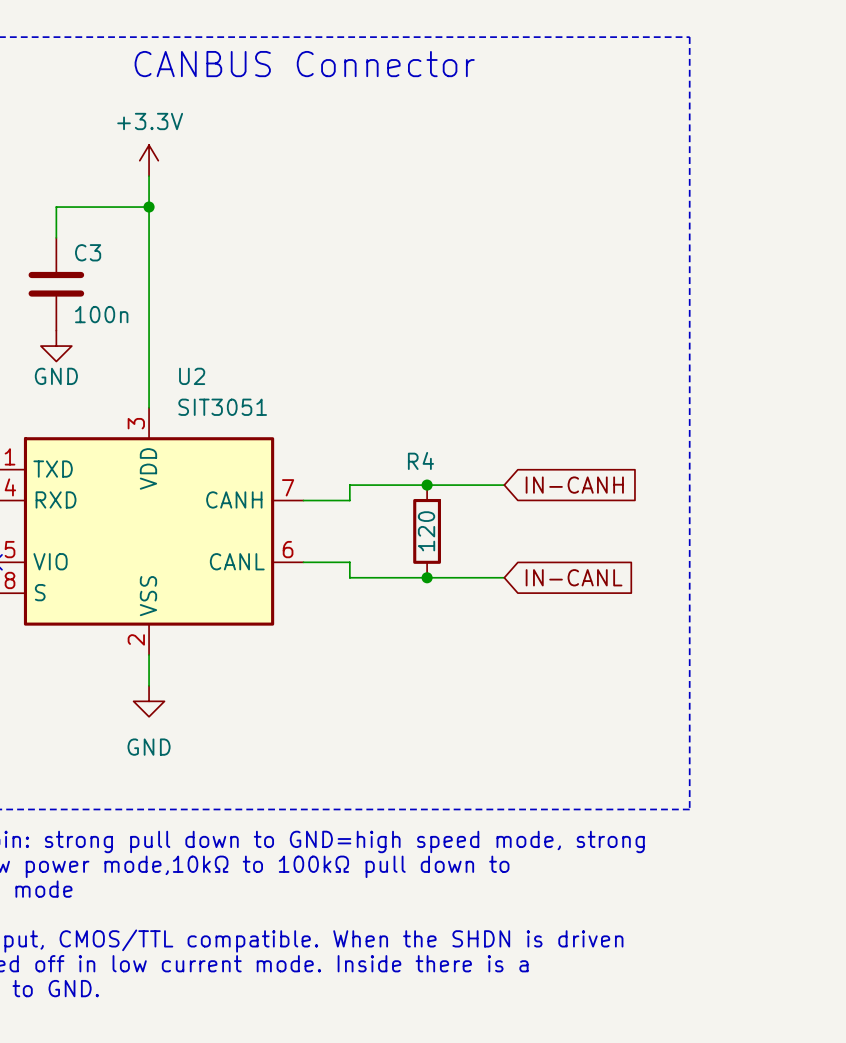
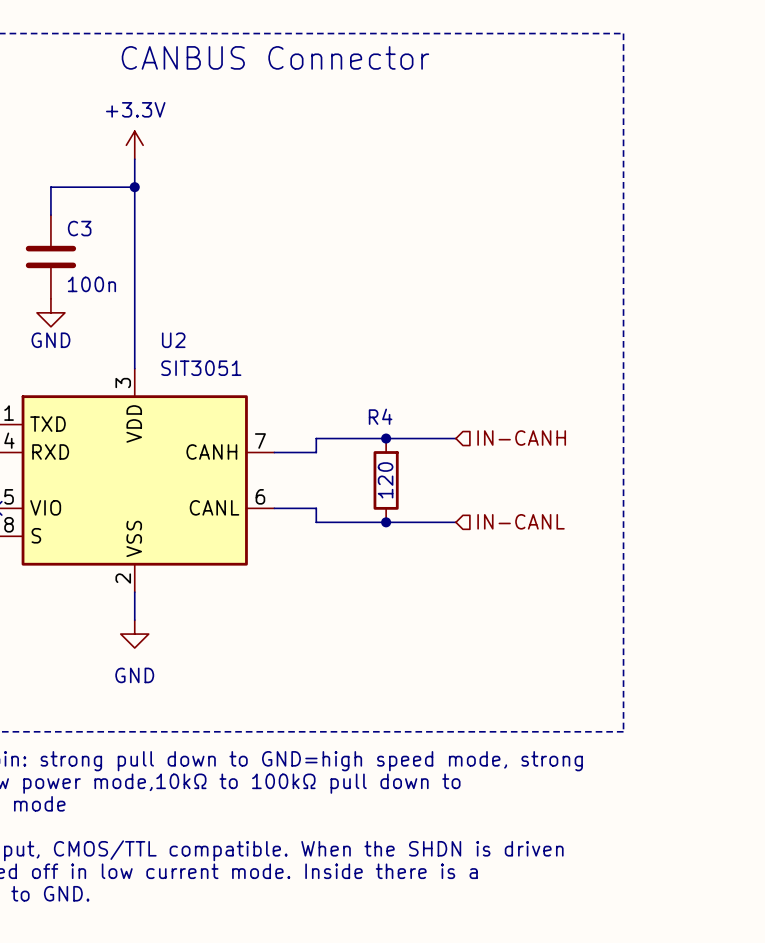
hierarchical label: none -> IN-CANH (521, 438)
global label: IN-CANH (574, 485) -> none
global label: IN-CANL (574, 577) -> none
hierarchical label: none -> IN-CANL (521, 521)

